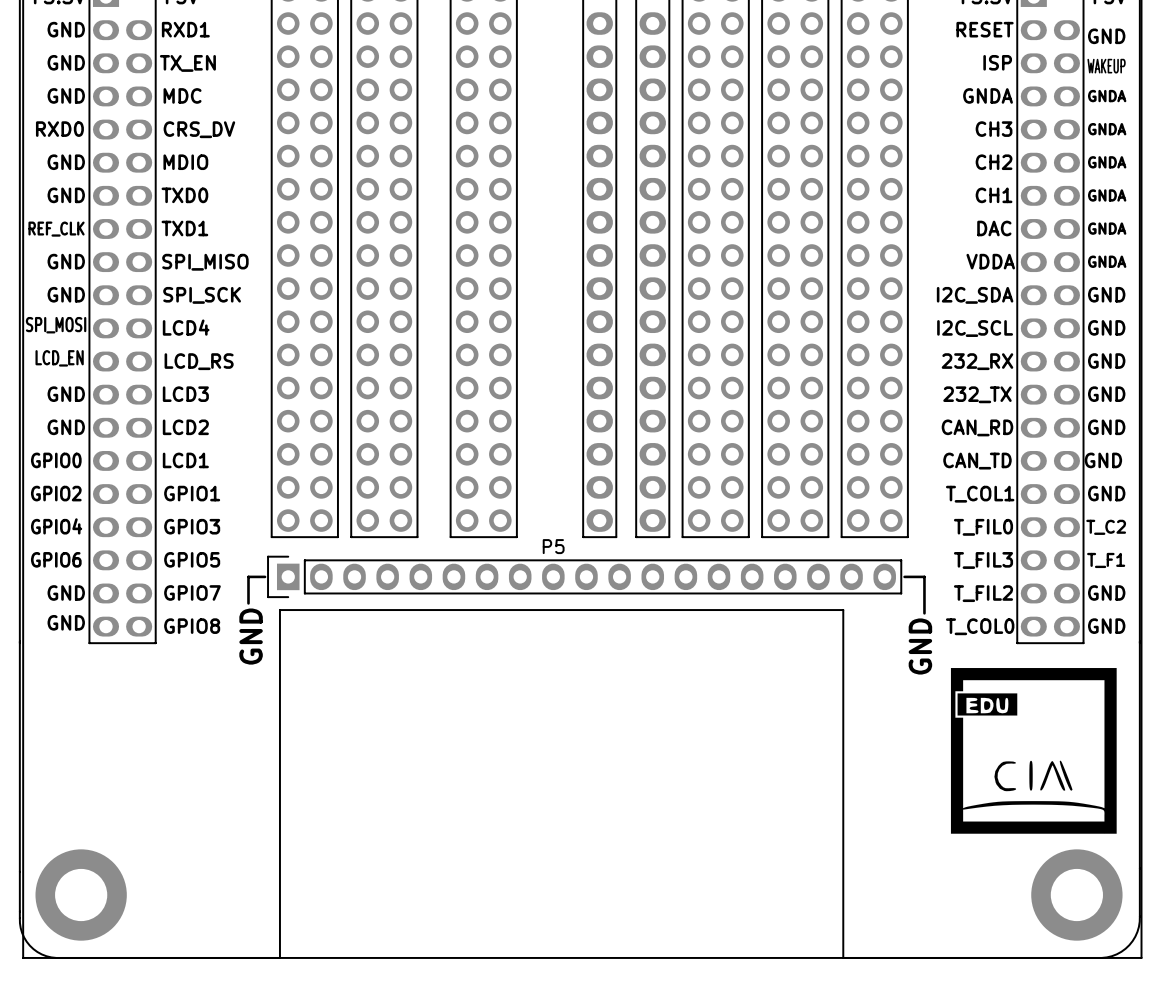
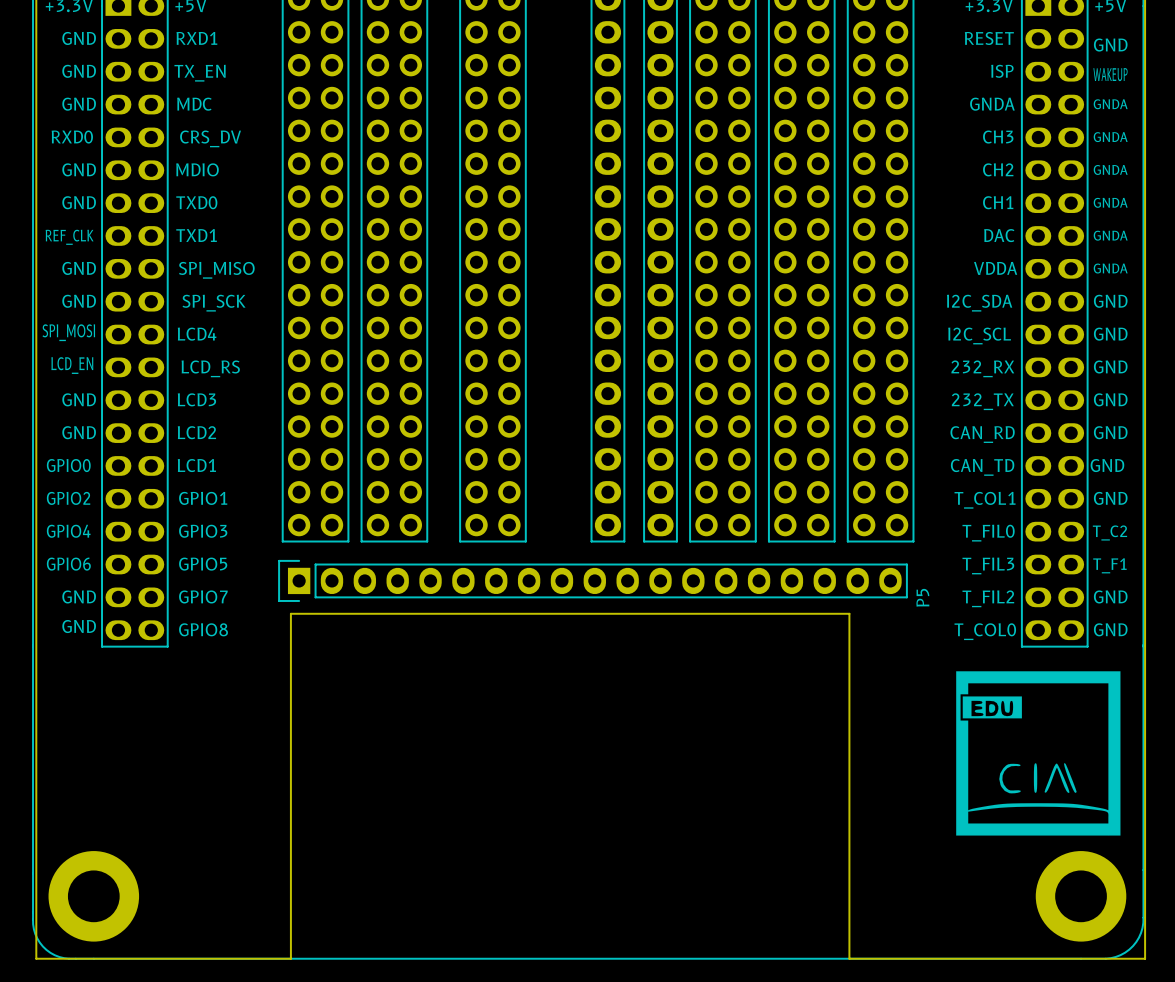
P5 name rotation: 0° (553, 546) -> 90° counterclockwise (922, 597)
P5 name position: P5 (553, 546) -> P5 (922, 597)
line: (265, 576) (248, 576) (248, 603) -> none
line: (904, 576) (924, 576) (924, 613) -> none
text: GND (251, 636) -> none
text: GND (920, 646) -> none

